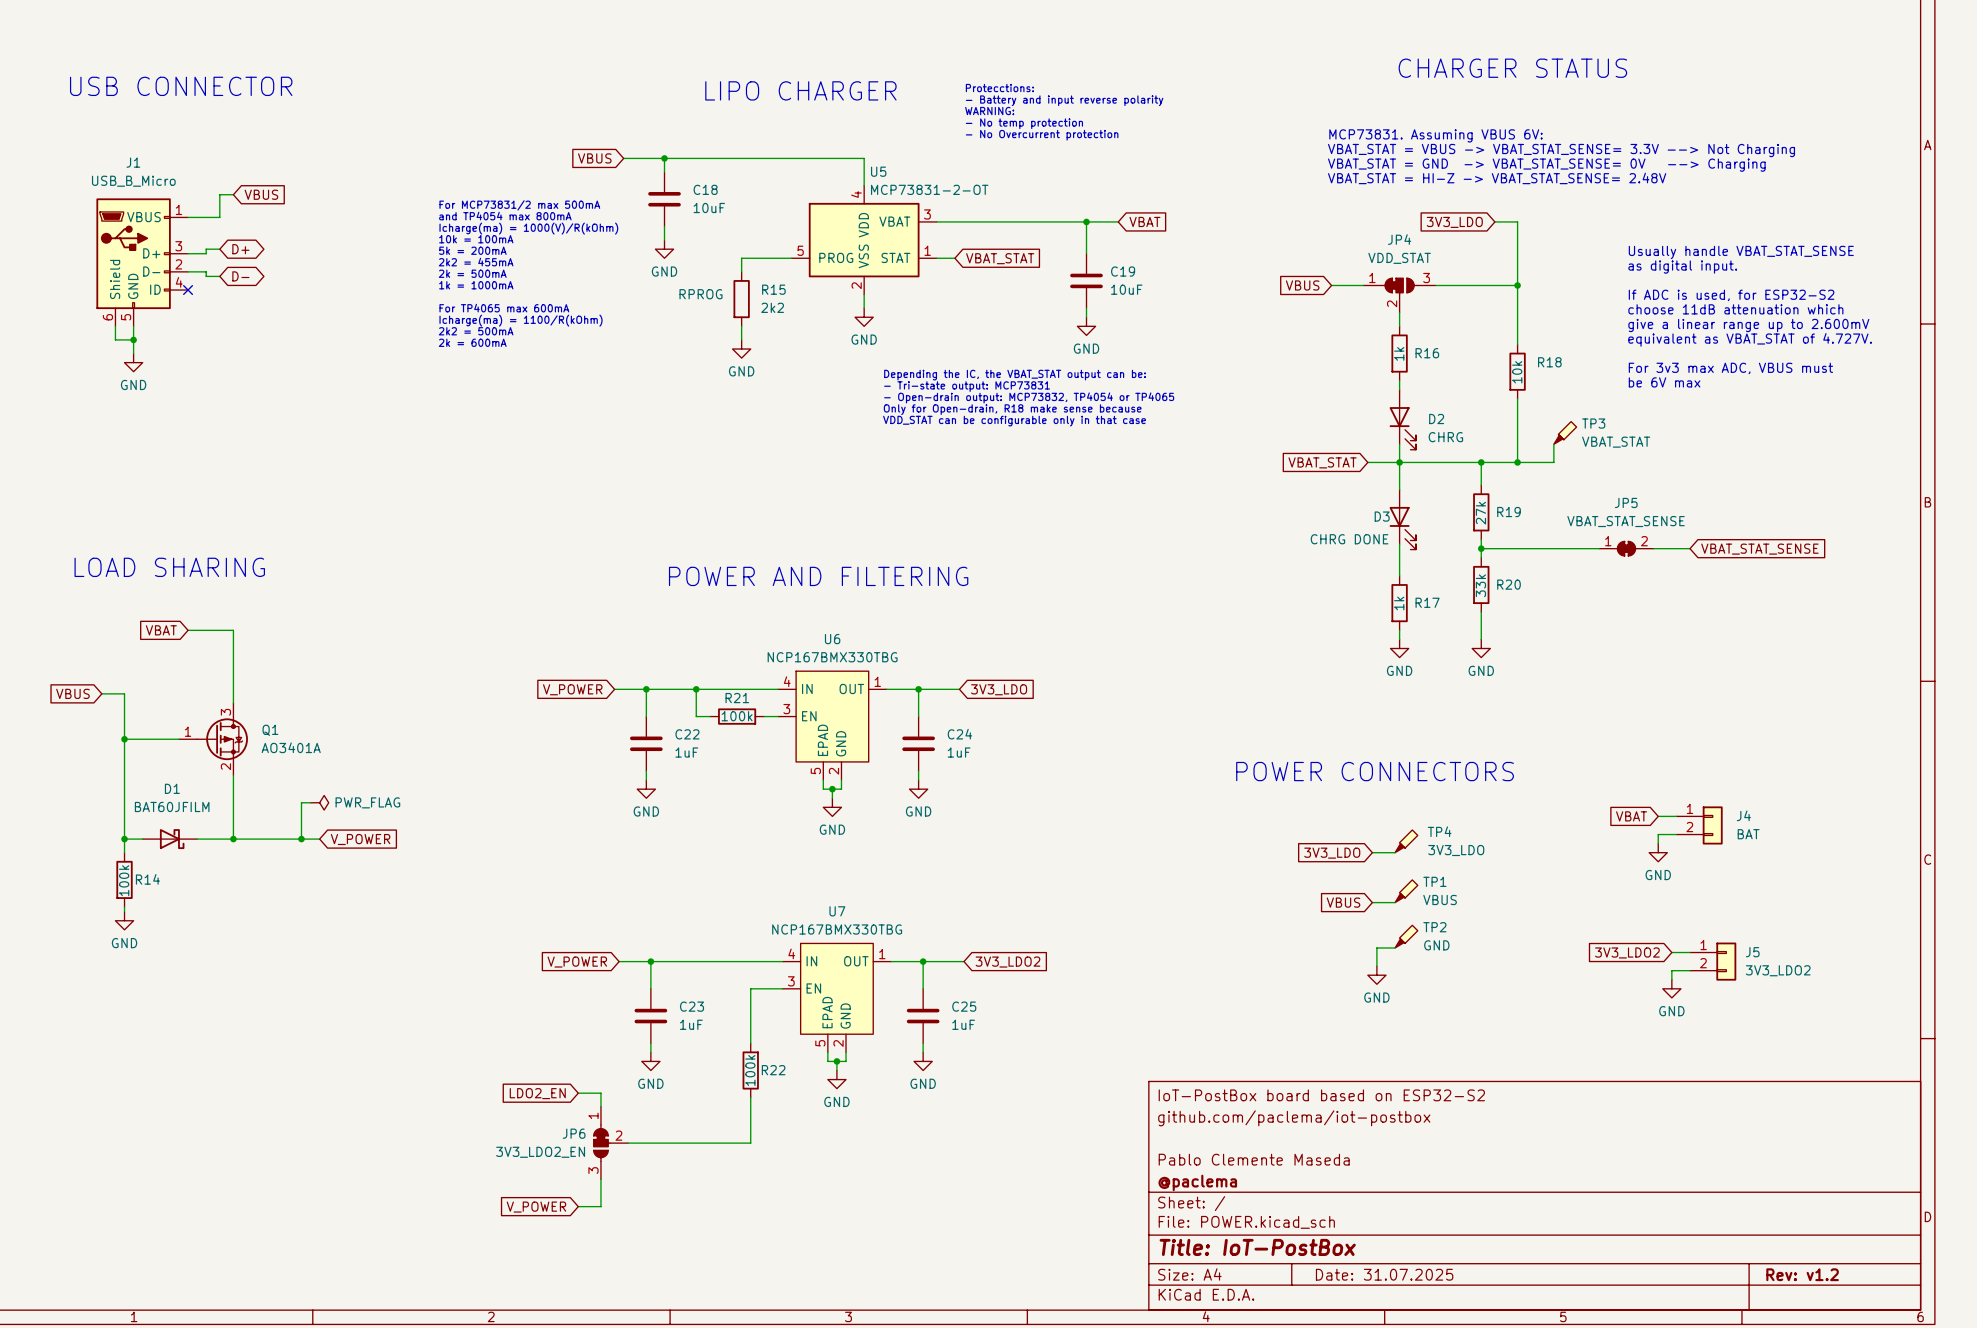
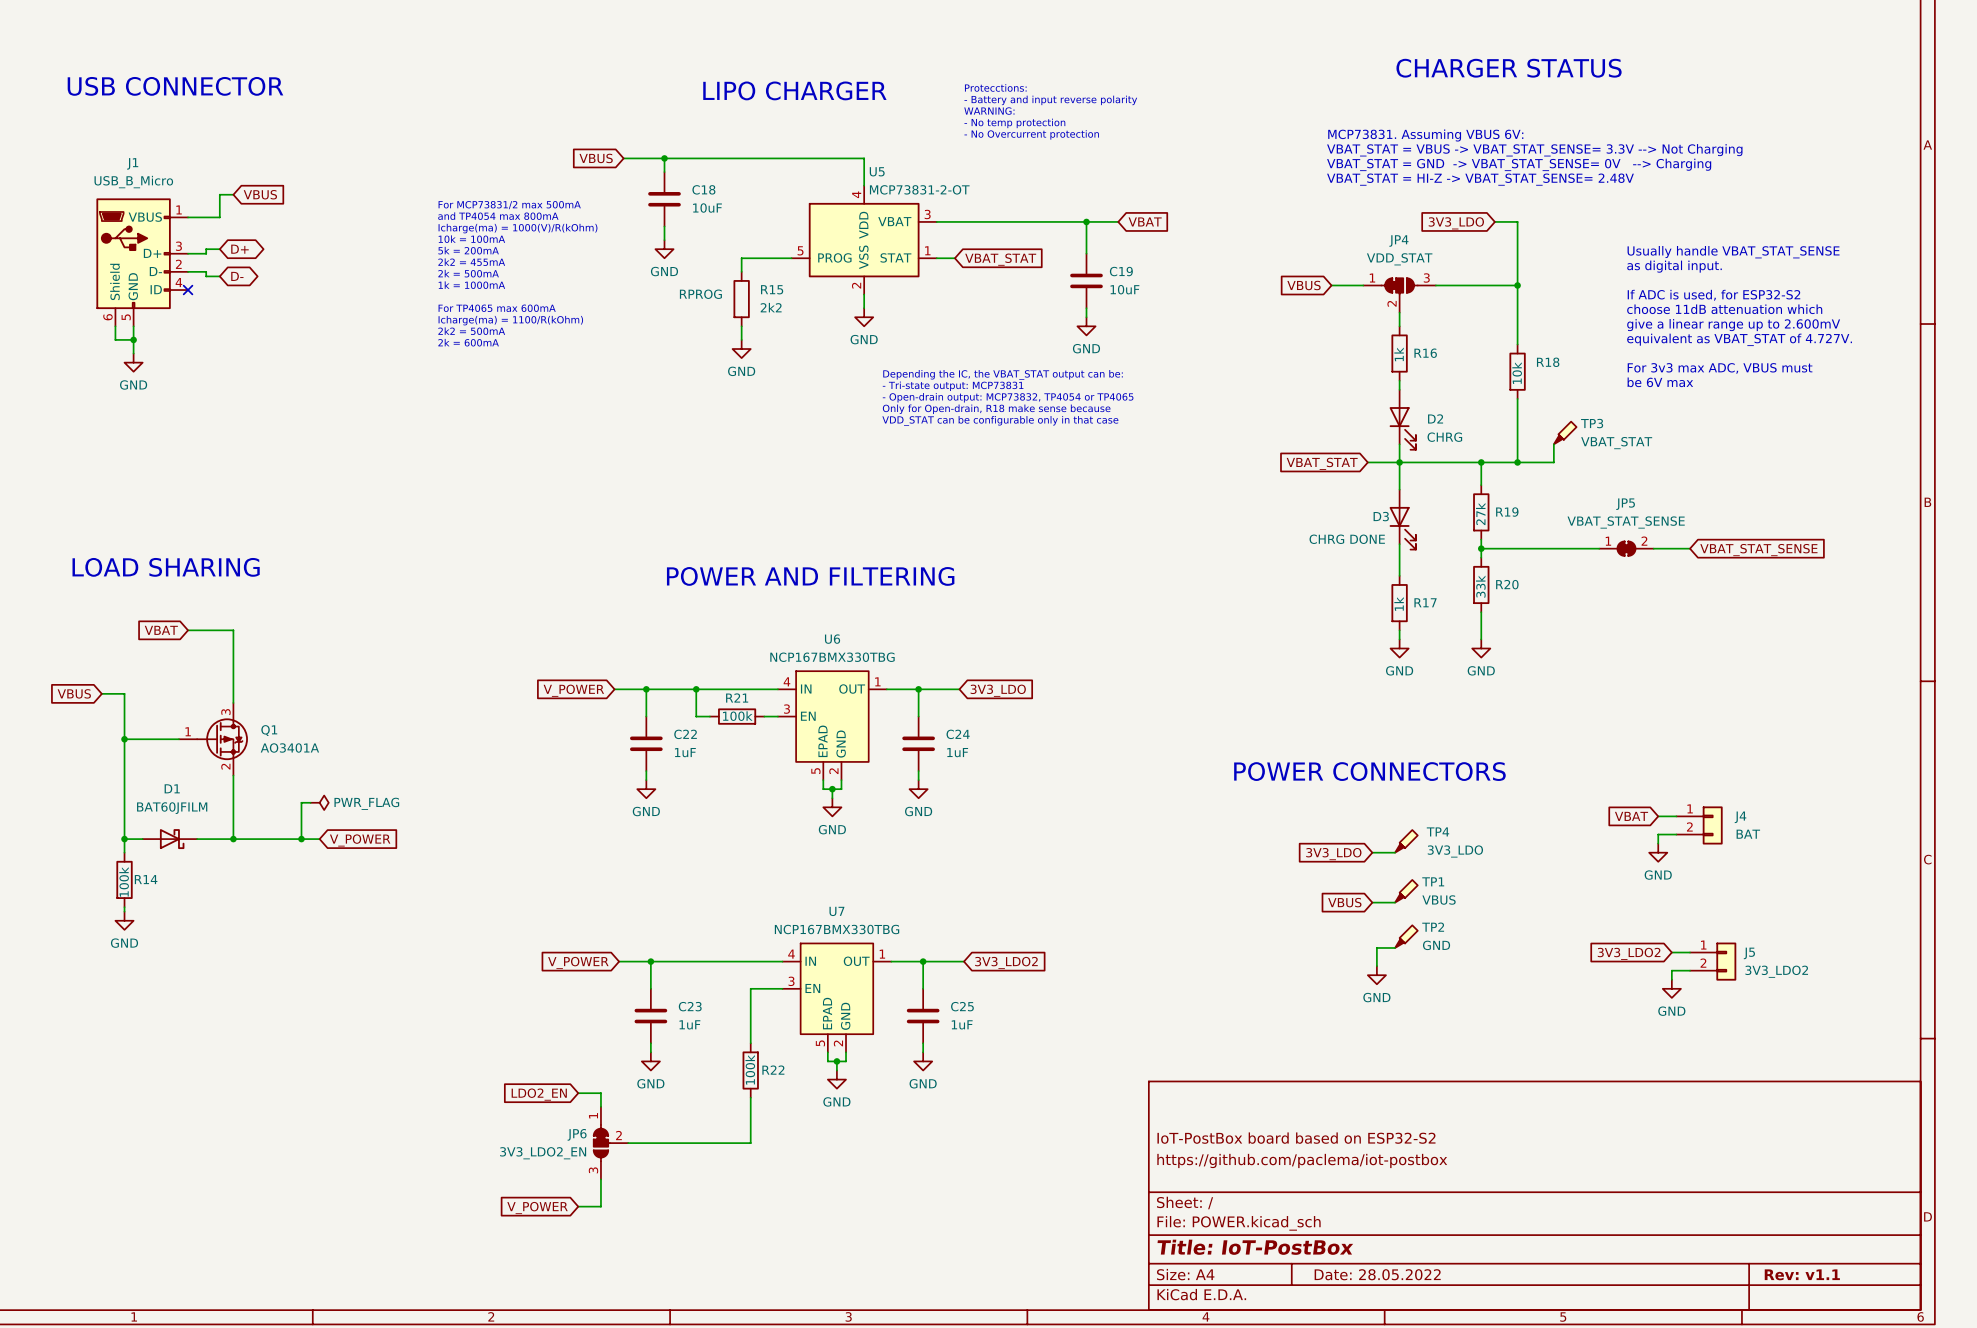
title block position: IoT-PostBox board based on ESP32-S2 (1321, 1095) -> IoT-PostBox board based on ESP32-S2 (1296, 1138)
title block: github.com/paclema/iot-postbox (1294, 1118) -> none
title block: Pablo Clemente Maseda (1254, 1159) -> https://github.com/paclema/iot-postbox (1302, 1160)
title block: @paclema (1197, 1182) -> none
title block: Date: 31.07.2025 (1384, 1274) -> Date: 28.05.2022 (1377, 1274)
title block: Rev: v1.2 (1802, 1274) -> Rev: v1.1 (1802, 1274)

